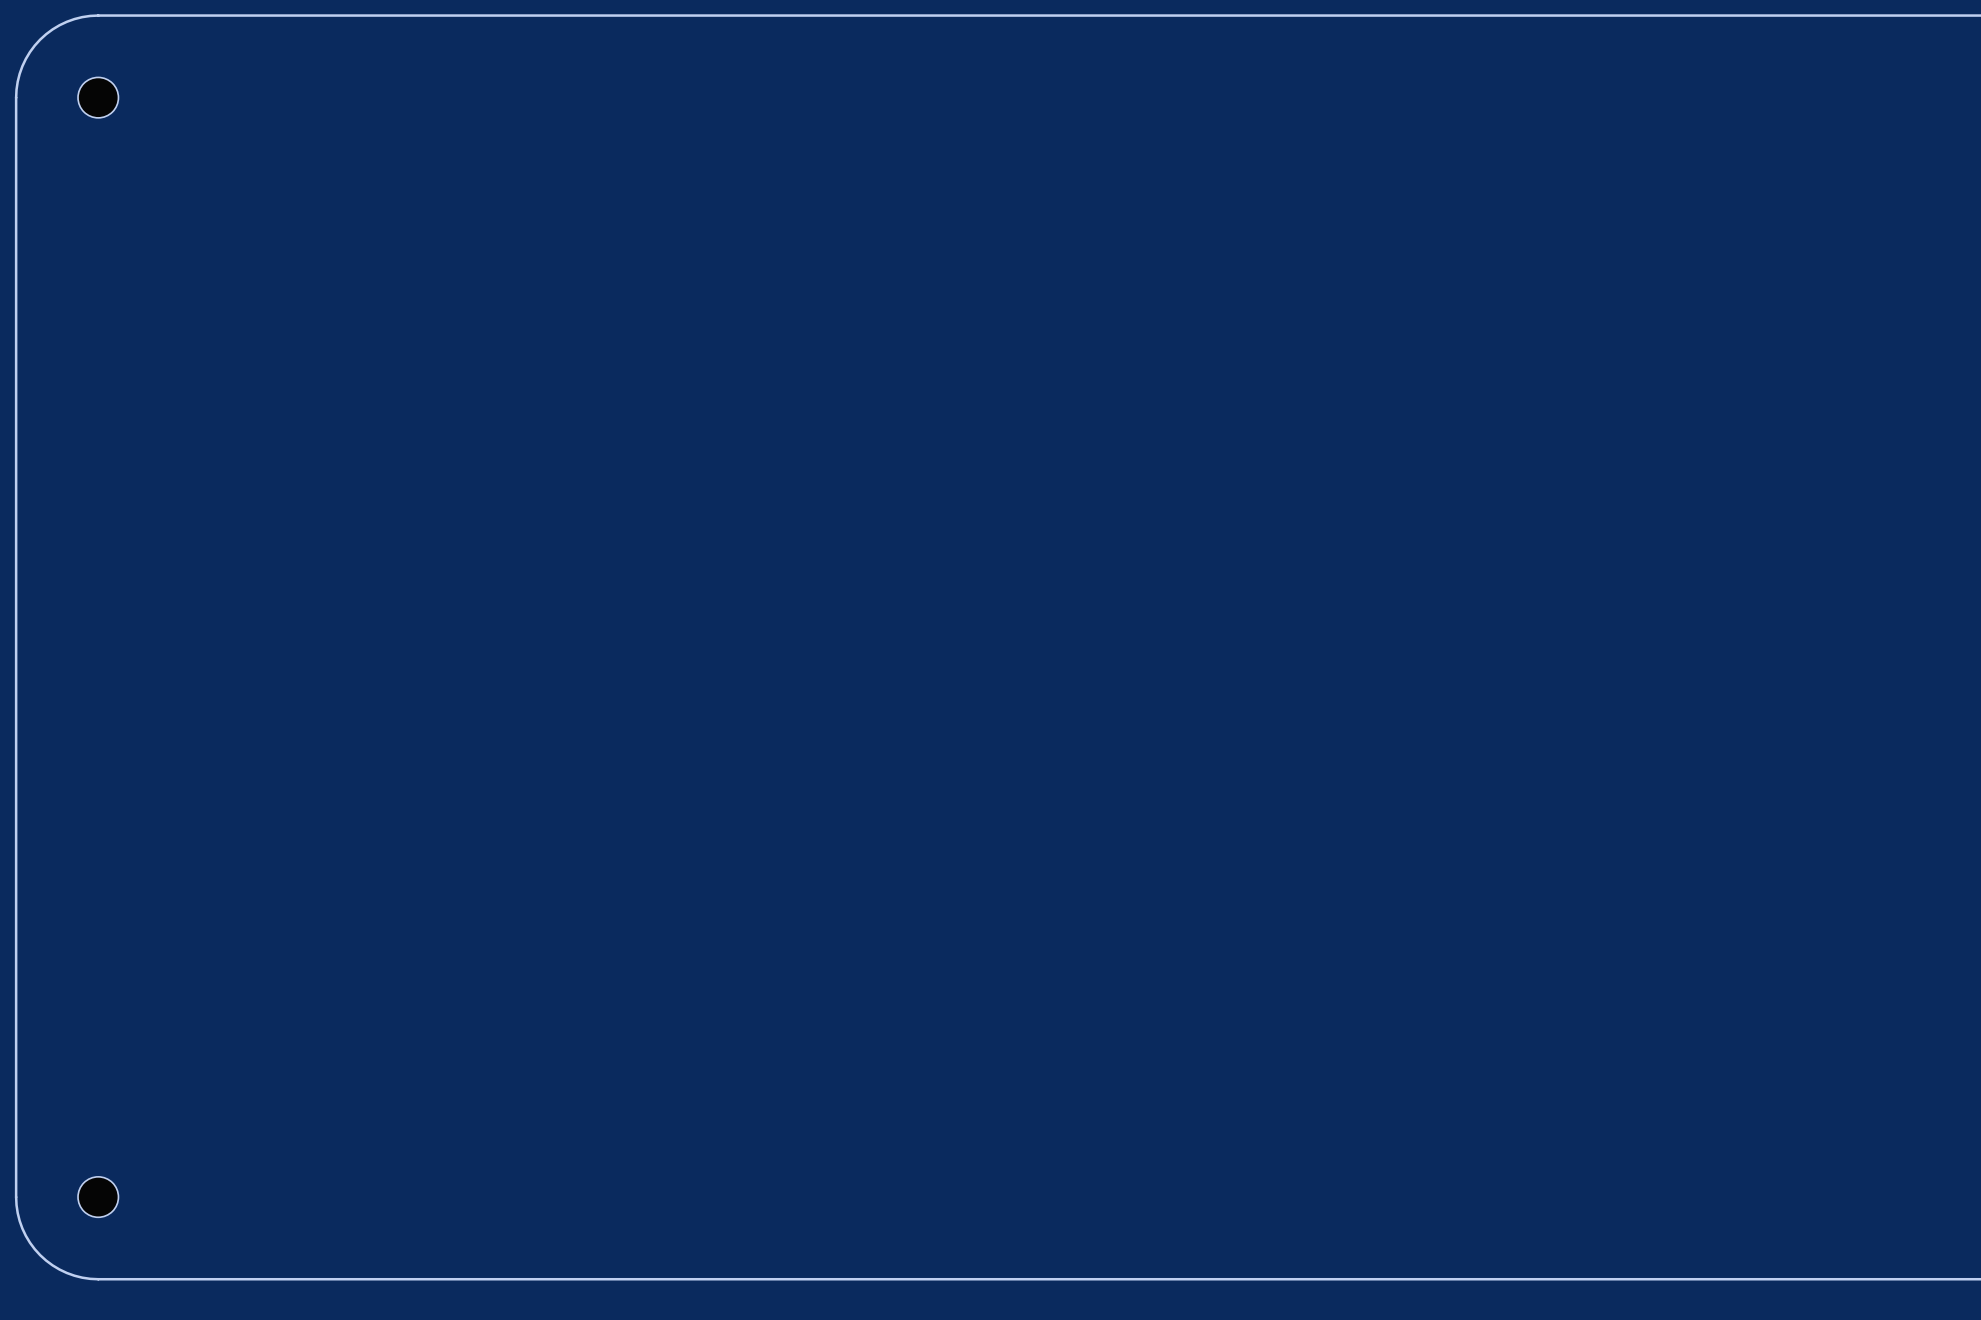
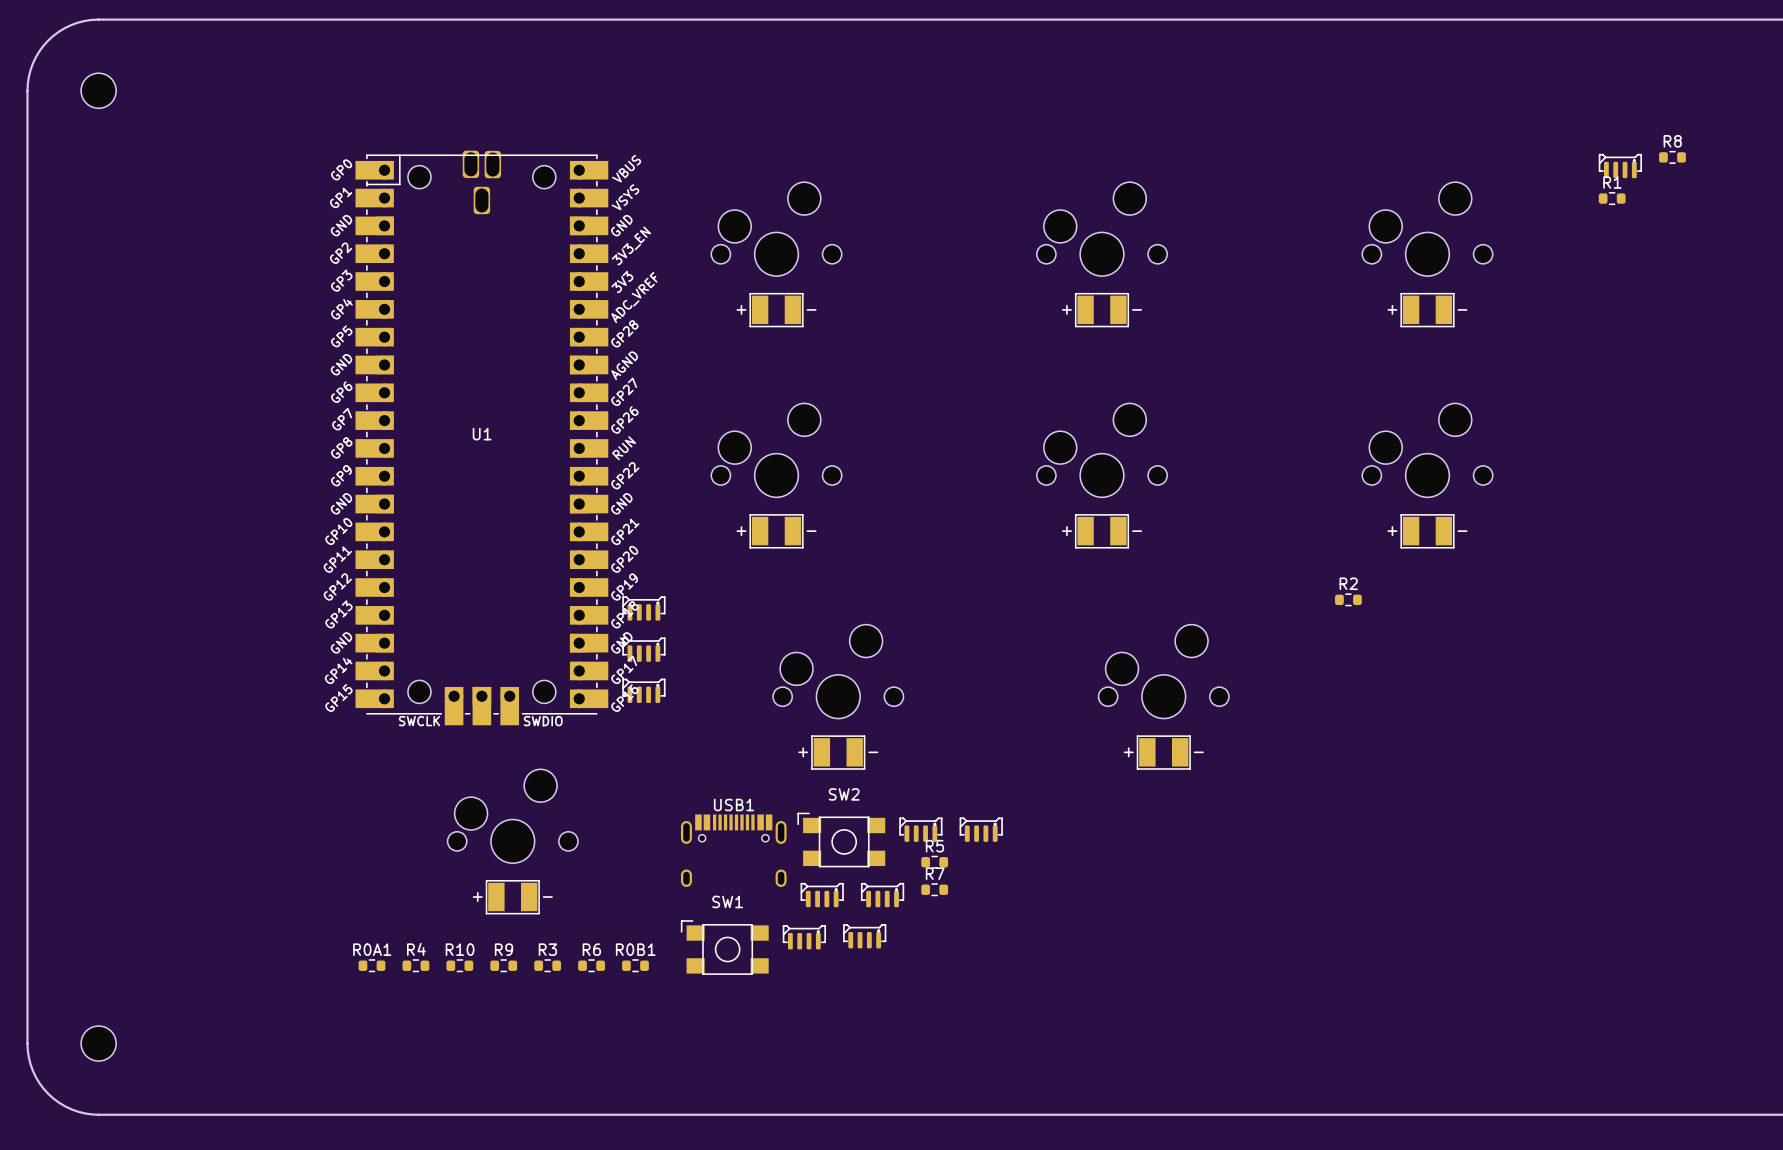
R8: none -> (1672, 157)
part: none -> (1620, 166)
R1: none -> (1612, 198)
part: none -> (776, 254)
part: none -> (1102, 254)
part: none -> (1427, 254)
U1: none -> (481, 437)
part: none -> (776, 475)
part: none -> (1102, 475)
part: none -> (1427, 475)
R2: none -> (1348, 599)
part: none -> (643, 608)
part: none -> (643, 649)
part: none -> (643, 690)
part: none -> (838, 697)
part: none -> (1163, 697)
part: none -> (920, 829)
part: none -> (981, 829)
SW2: none -> (841, 840)
part: none -> (512, 841)
USB1: none -> (733, 850)
R5: none -> (934, 862)
R7: none -> (934, 889)
part: none -> (822, 895)
part: none -> (882, 895)
part: none -> (864, 936)
part: none -> (804, 937)
SW1: none -> (724, 947)
R0A1: none -> (371, 965)
R4: none -> (415, 965)
R10: none -> (459, 965)
R9: none -> (503, 965)
R3: none -> (547, 965)
R6: none -> (591, 965)
R0B1: none -> (635, 965)

